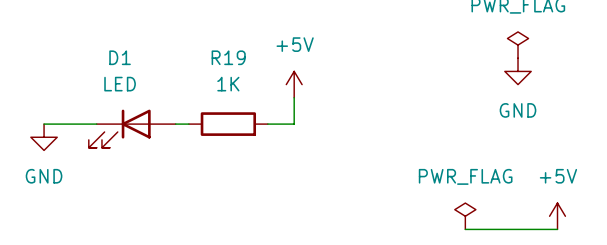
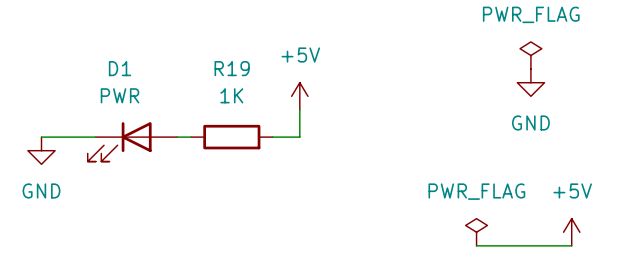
D1 value: LED (120, 84) -> PWR (119, 95)

